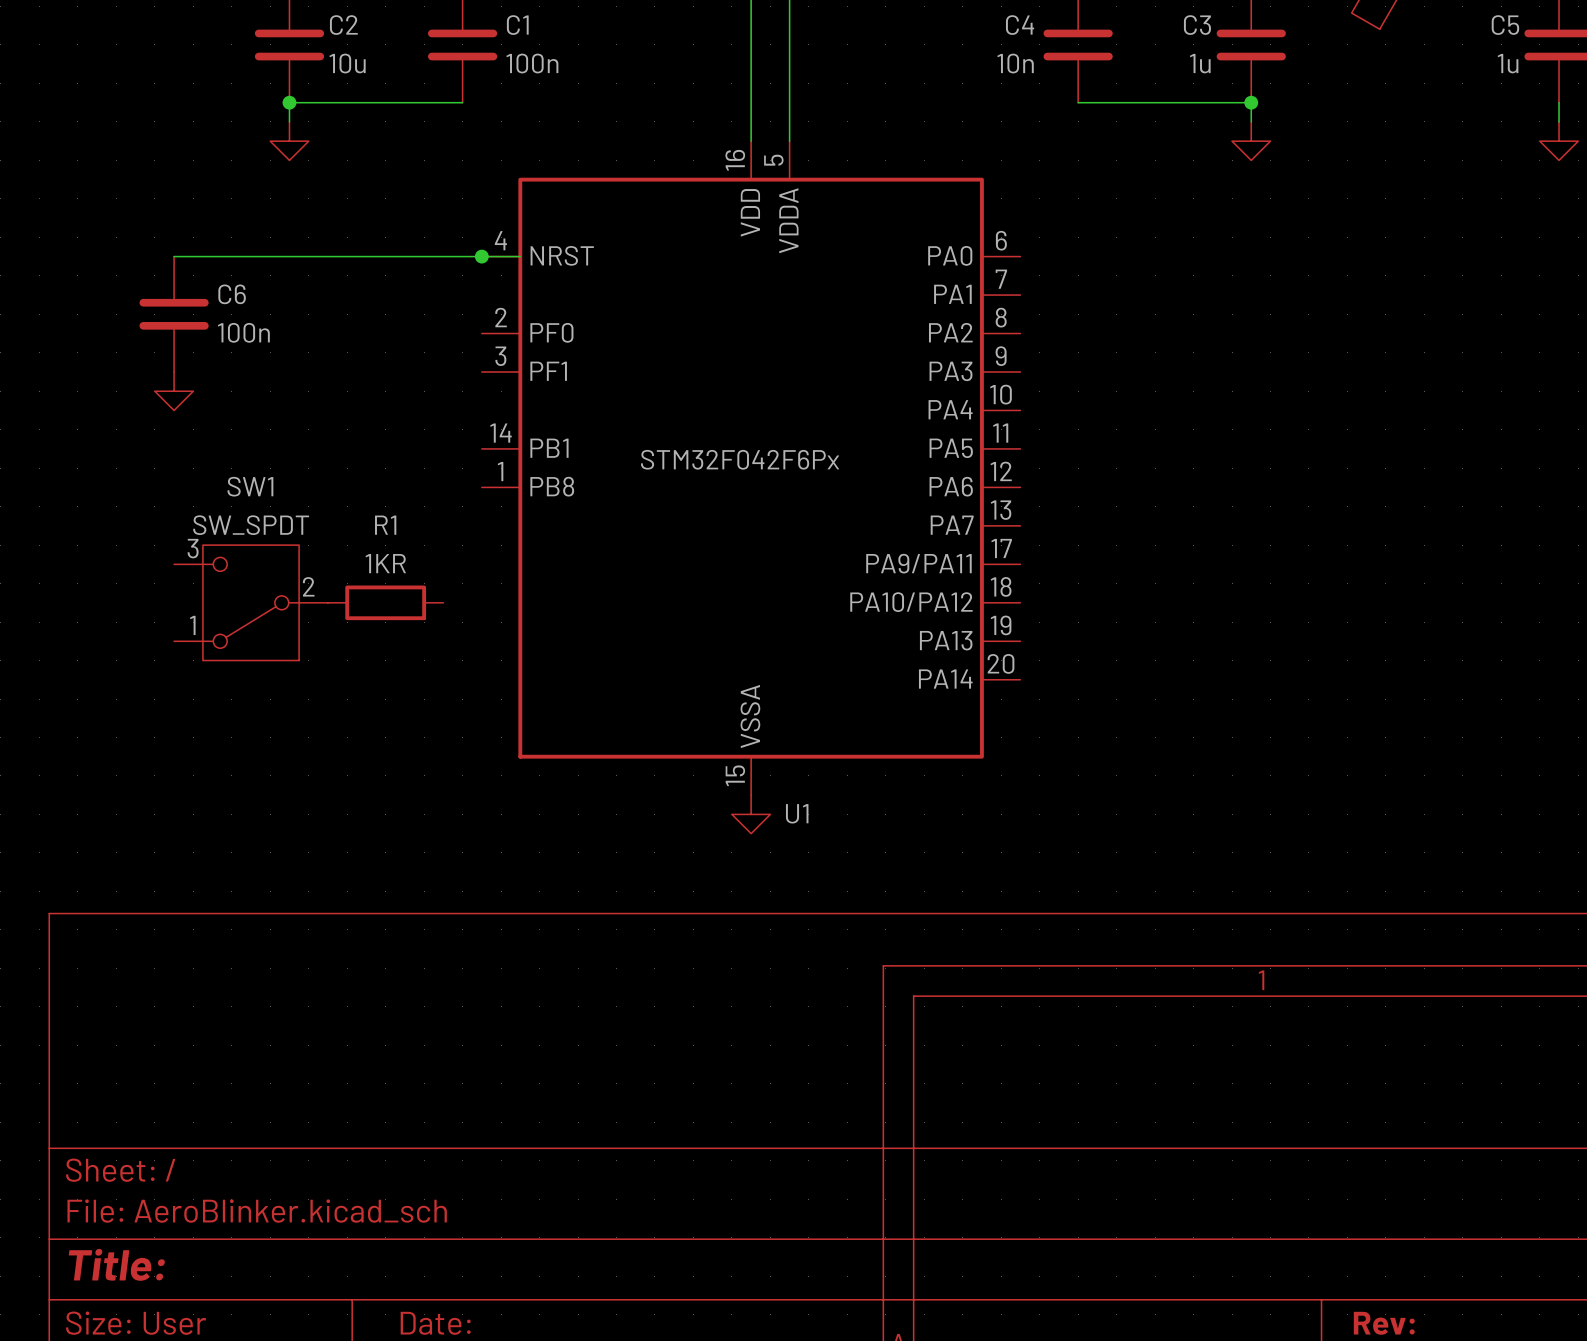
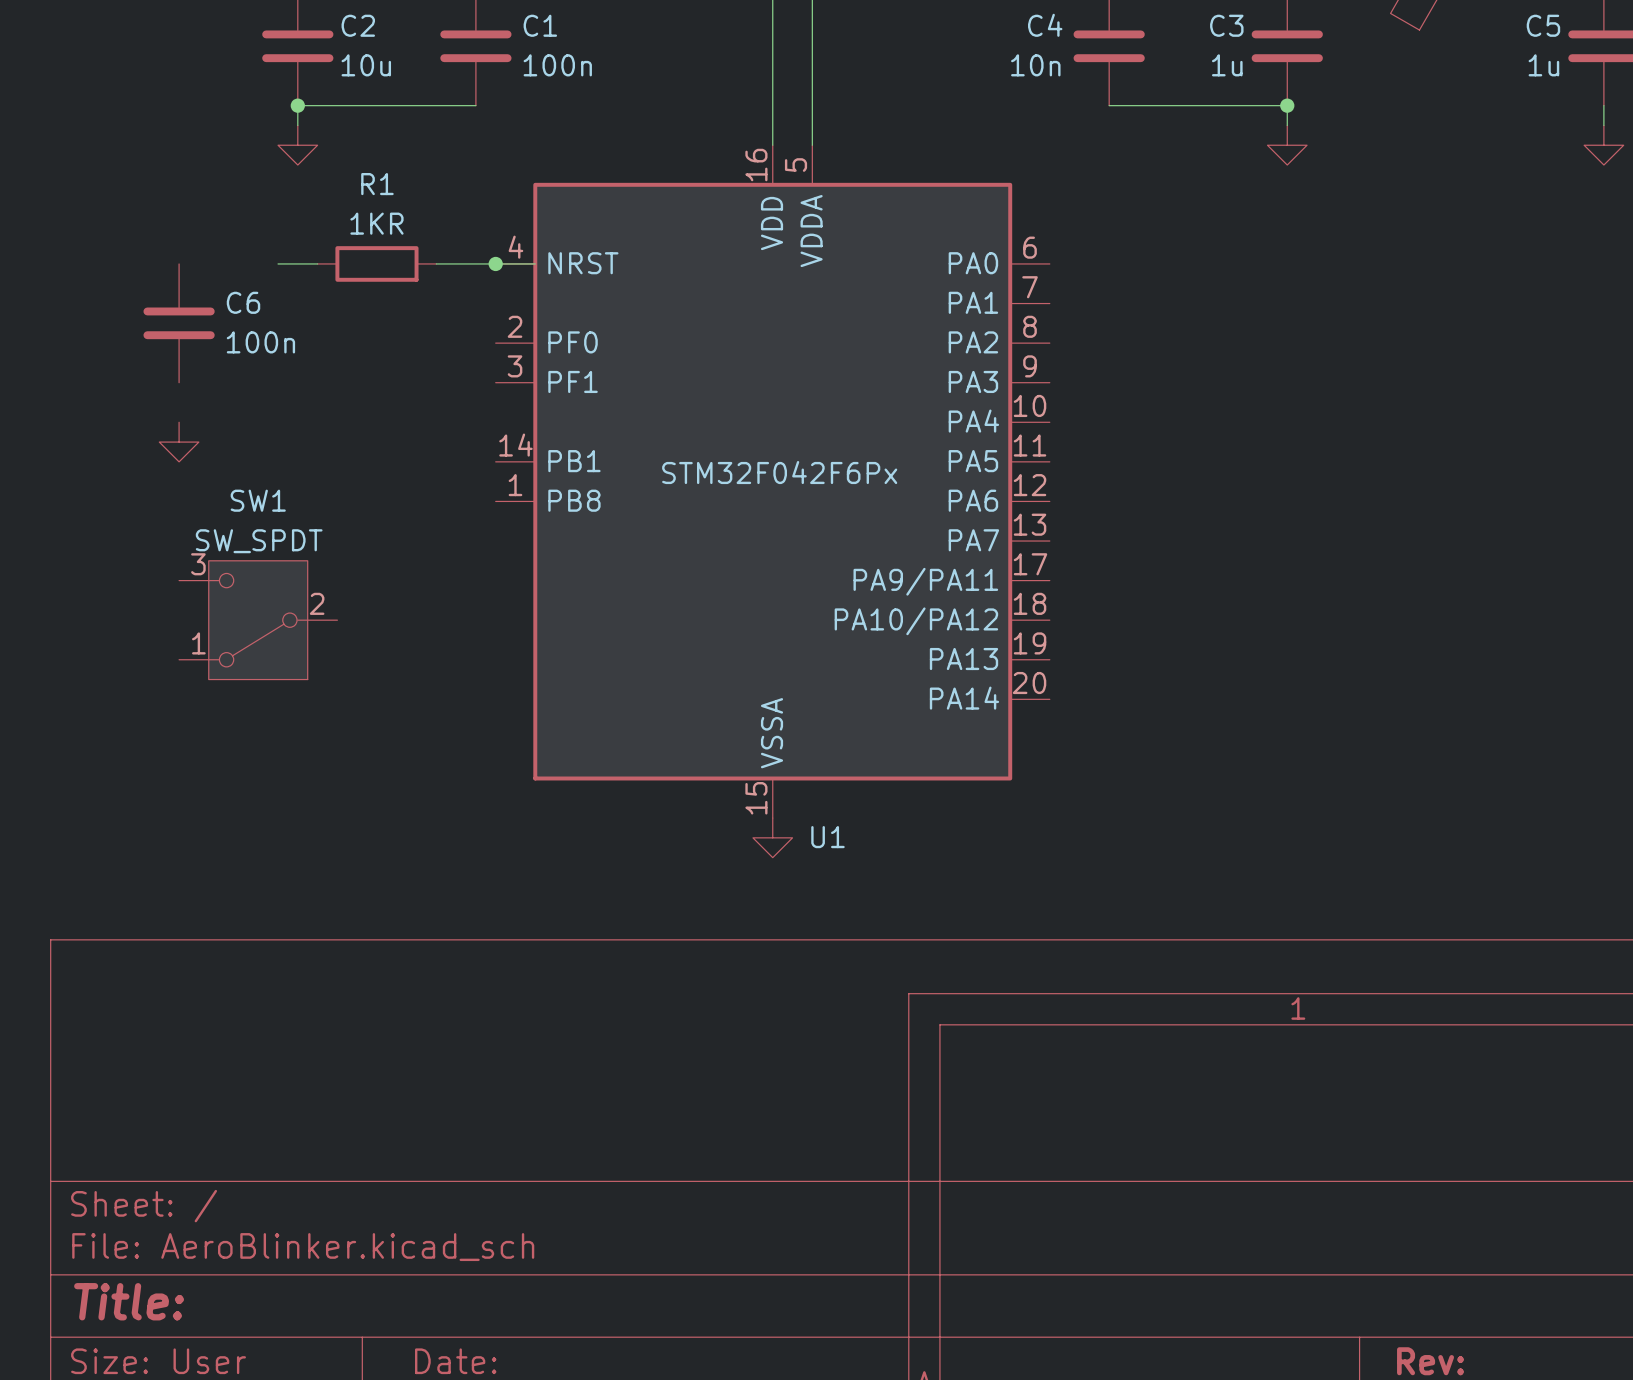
wire: (174, 256) (270, 256) -> none
wire: (308, 256) (424, 256) -> none
power symbol position: (174, 391) -> (179, 442)
R1 position: (385, 602) -> (376, 263)

